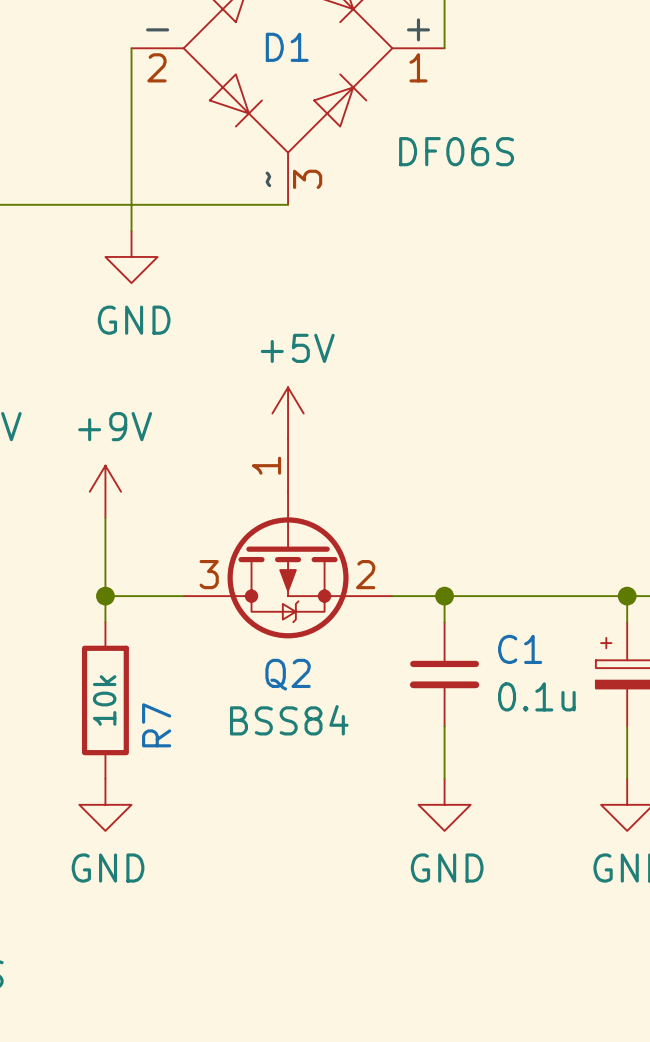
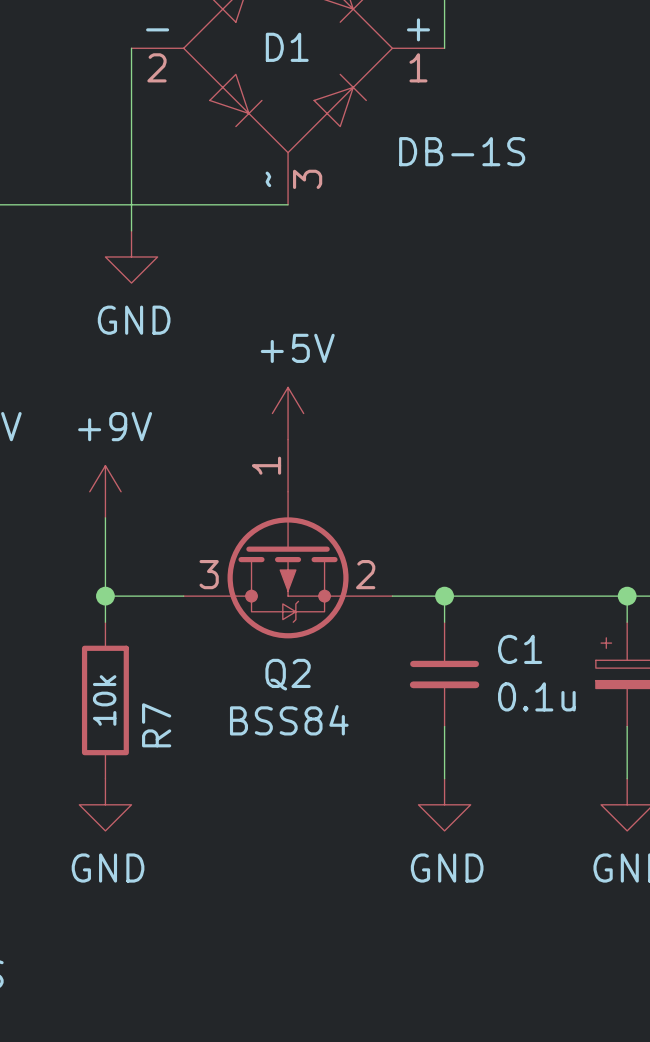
D1 value: DF06S (456, 151) -> DB-1S (462, 151)

